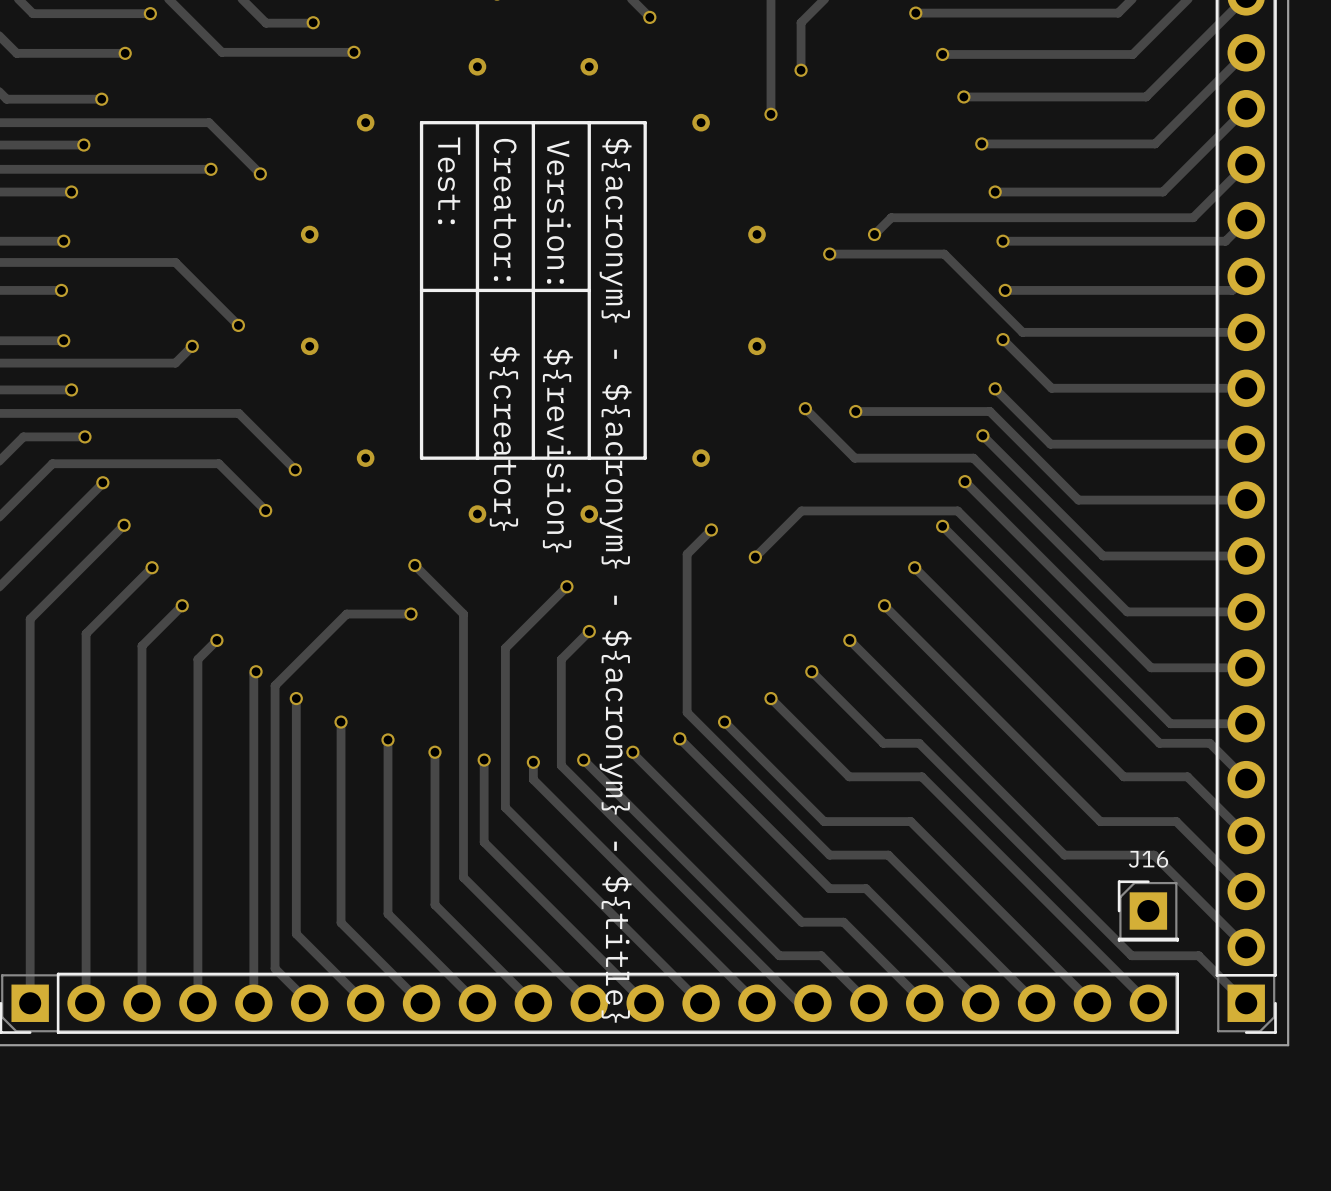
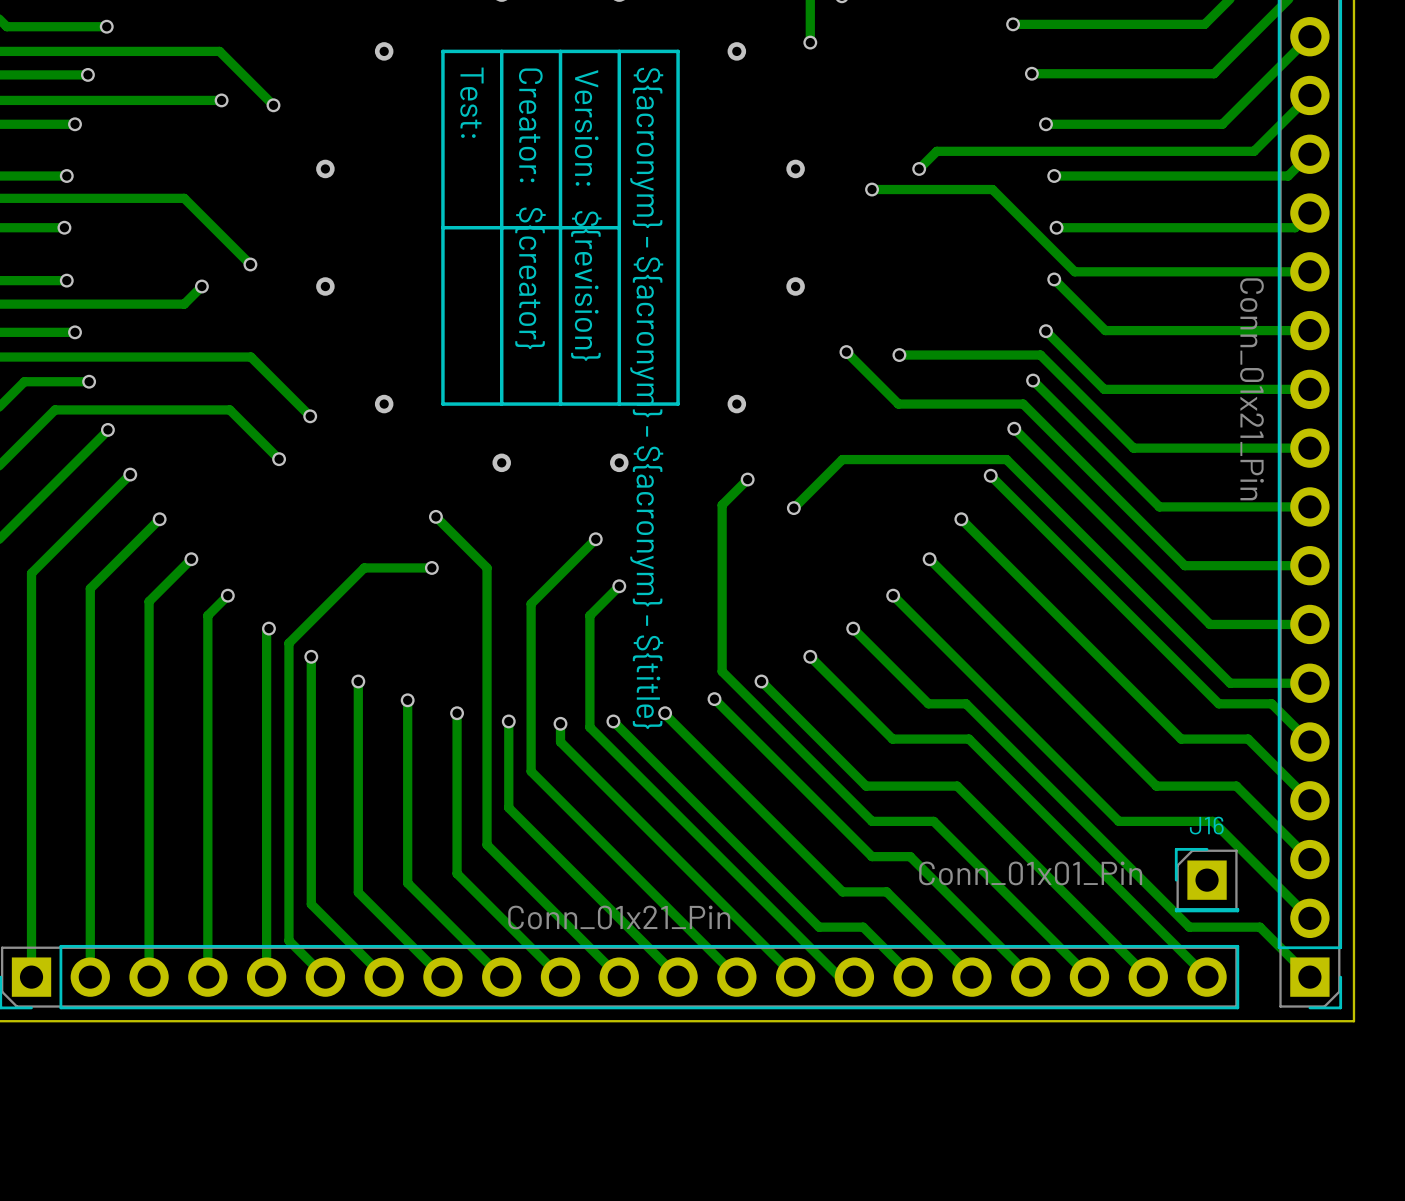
part value: none -> Conn_01x21_Pin (1251, 389)
J16 value: none -> Conn_01x01_Pin (1030, 873)
part value: none -> Conn_01x21_Pin (619, 917)

